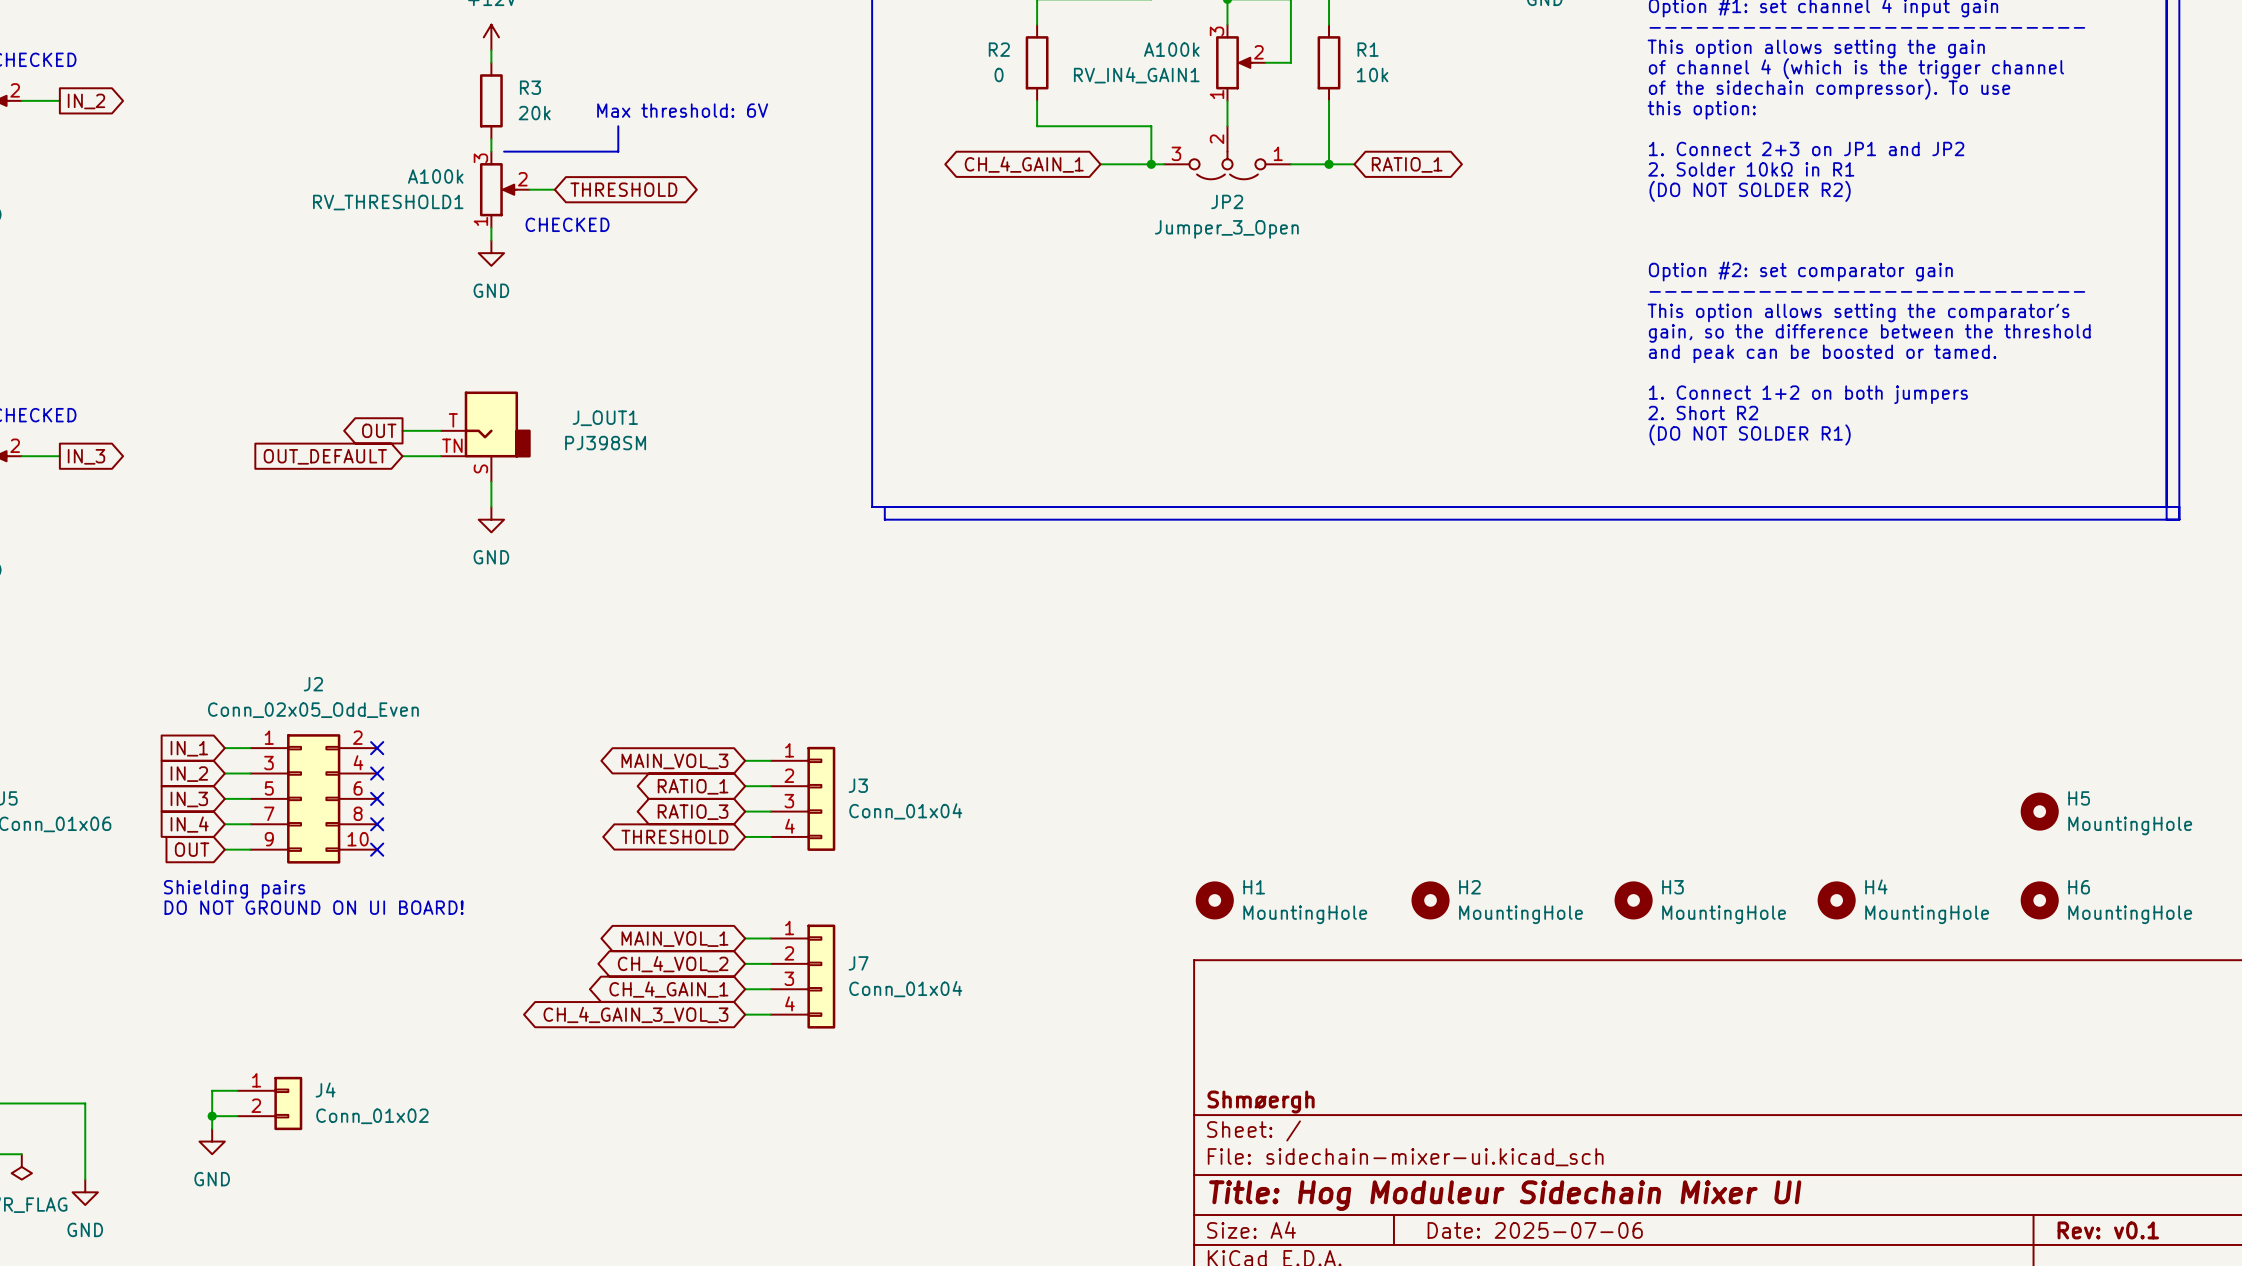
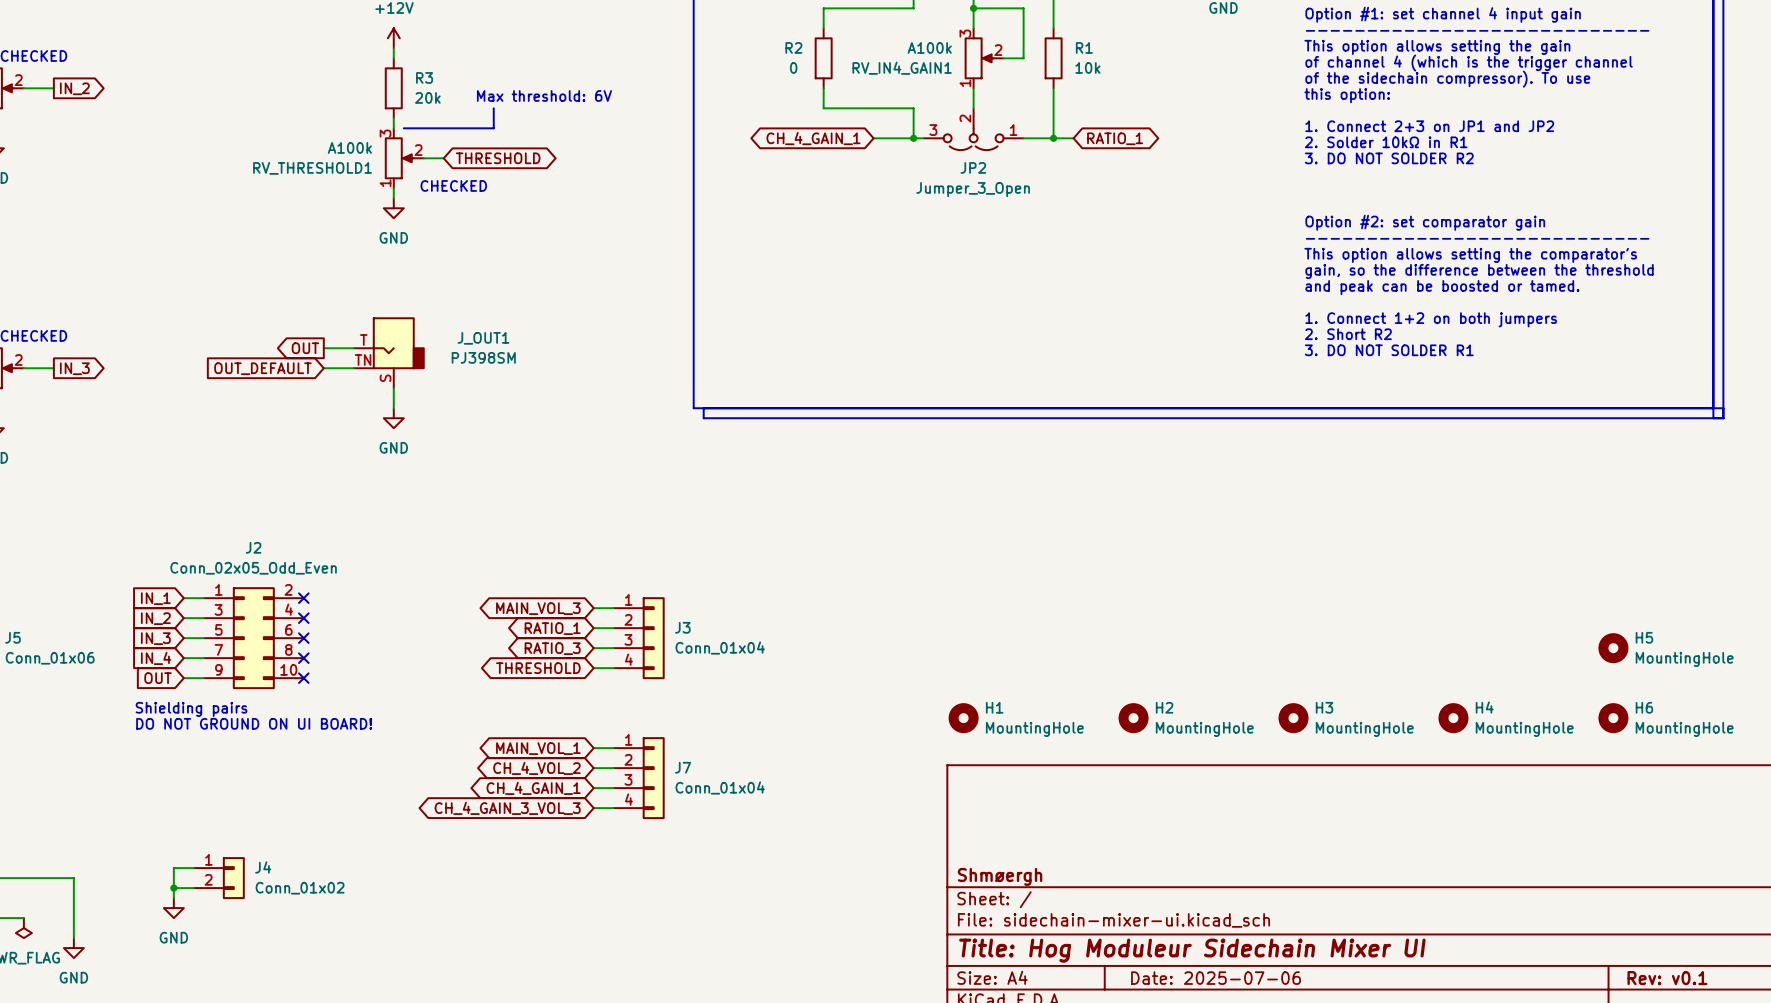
text: (DO NOT SOLDER R2) (1750, 191) -> 3. DO NOT SOLDER R2 (1389, 158)
text: (DO NOT SOLDER R1) (1750, 434) -> 3. DO NOT SOLDER R1 (1389, 350)

